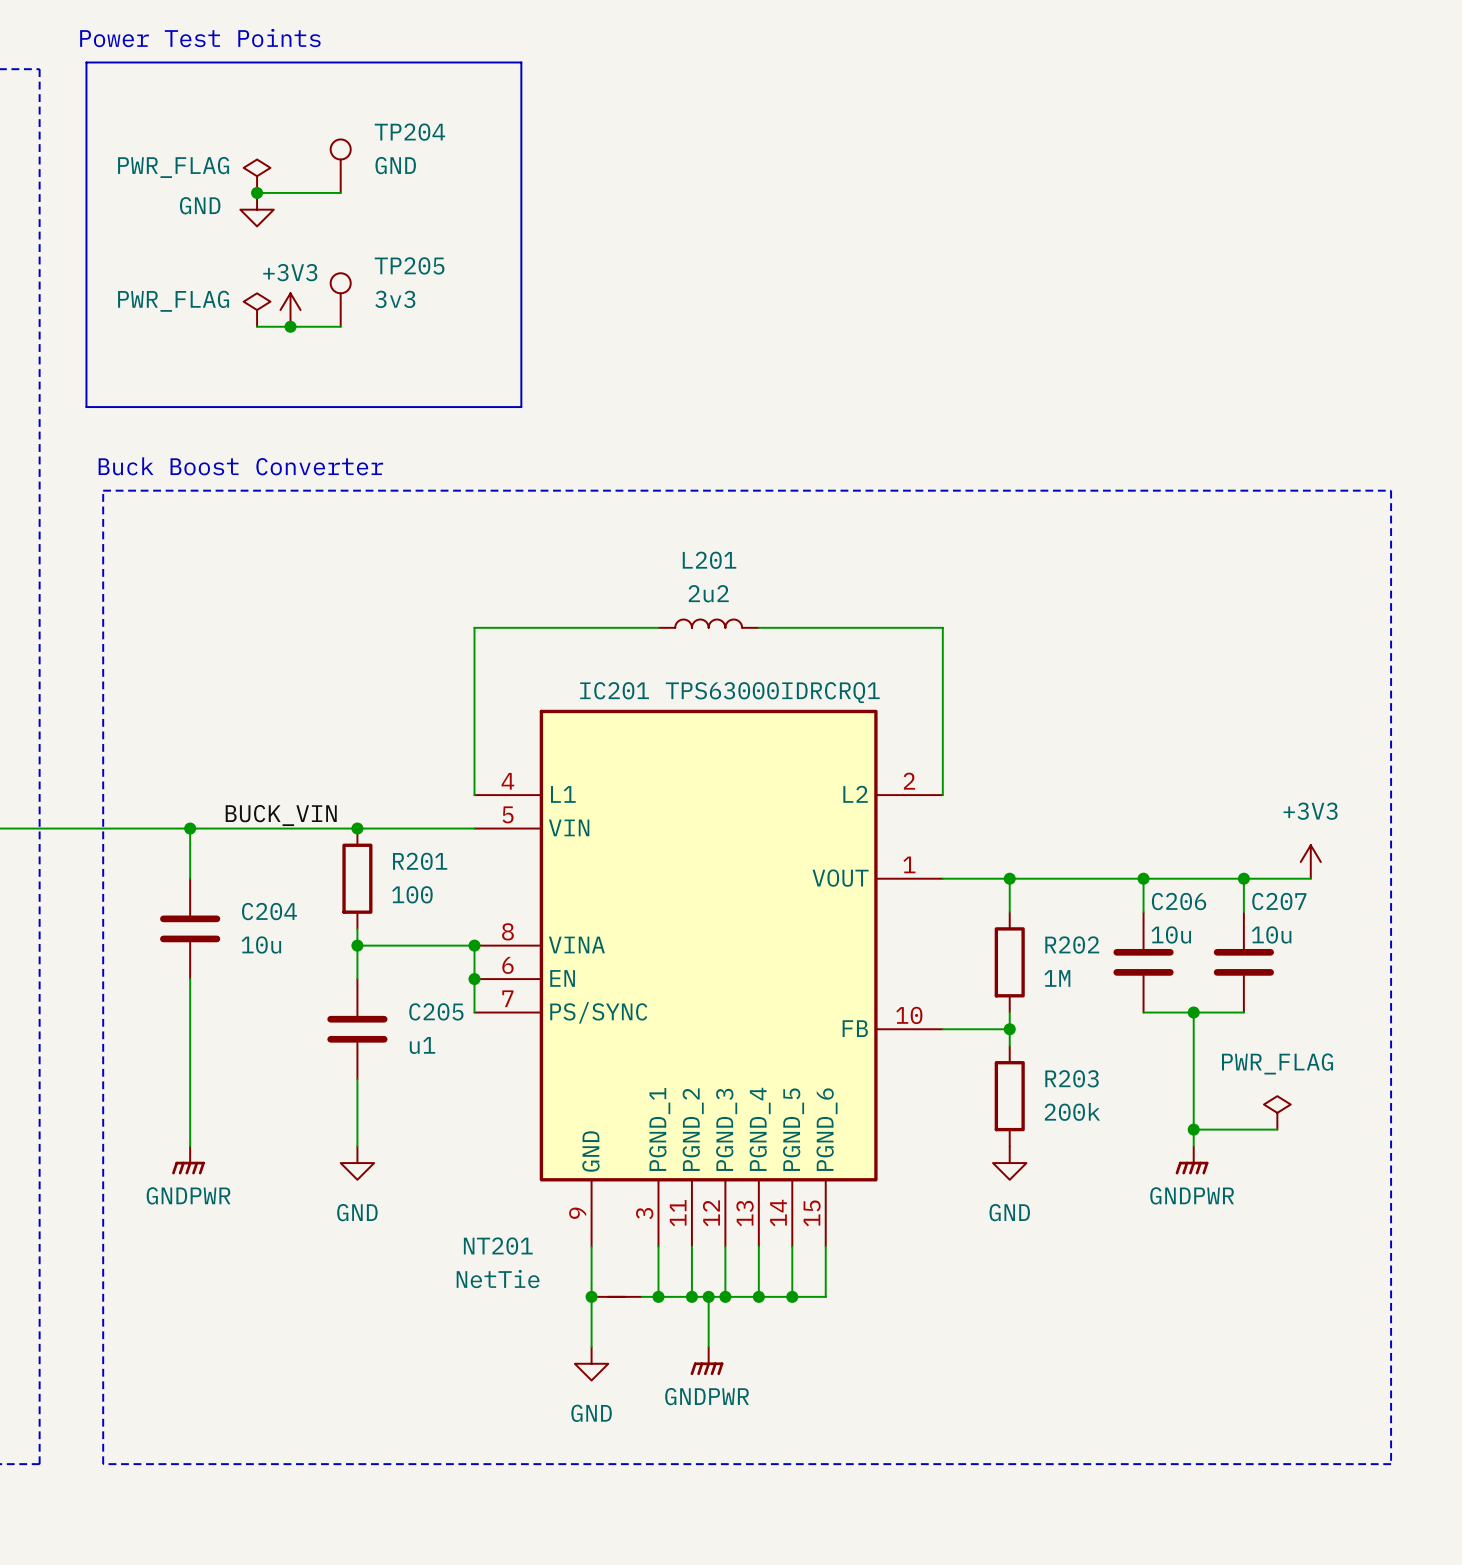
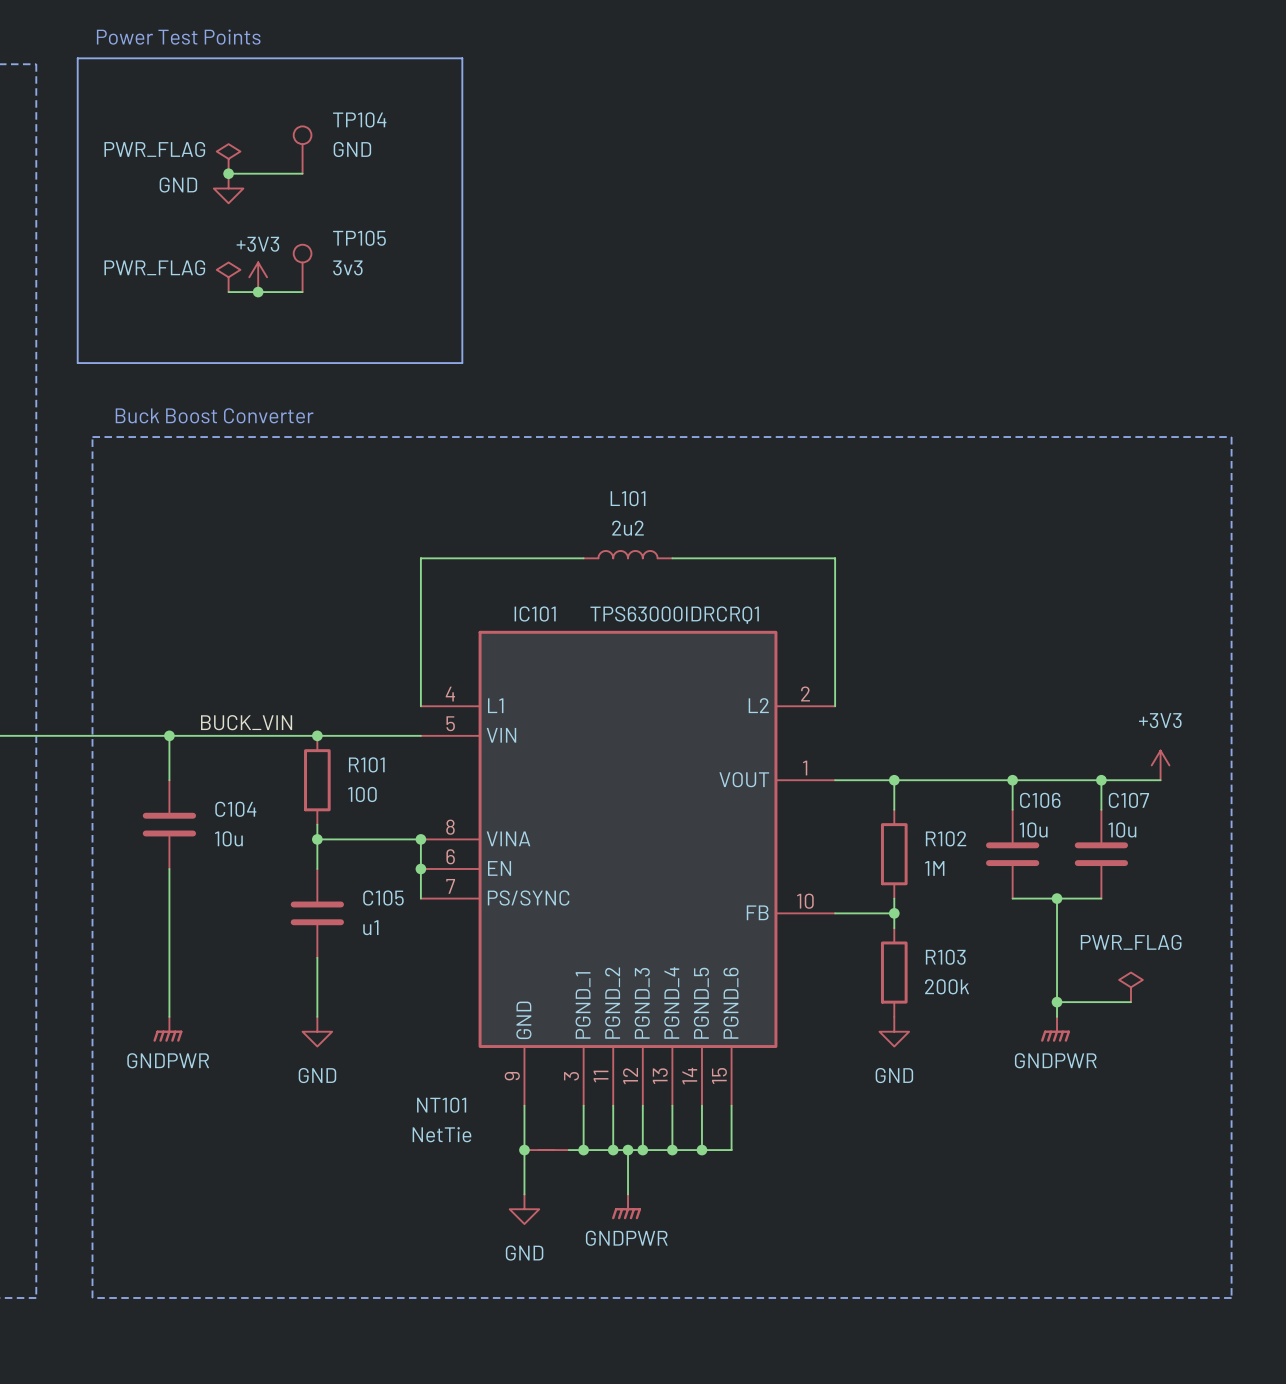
TP204 name: TP204 (409, 132) -> TP104 (359, 119)
TP205 name: TP205 (409, 265) -> TP105 (359, 238)
L201 name: L201 (709, 560) -> L101 (628, 498)
IC201 name: IC201 (614, 690) -> IC101 (535, 614)
R201 name: R201 (420, 861) -> R101 (366, 764)
C206 name: C206 (1179, 901) -> C106 (1040, 800)
C207 name: C207 (1279, 901) -> C107 (1128, 800)
C204 name: C204 (269, 911) -> C104 (235, 809)
R202 name: R202 (1072, 945) -> R102 (946, 838)
C205 name: C205 (436, 1011) -> C105 (383, 898)
R203 name: R203 (1072, 1078) -> R103 (945, 957)
NT201 name: NT201 (498, 1246) -> NT101 (441, 1105)

